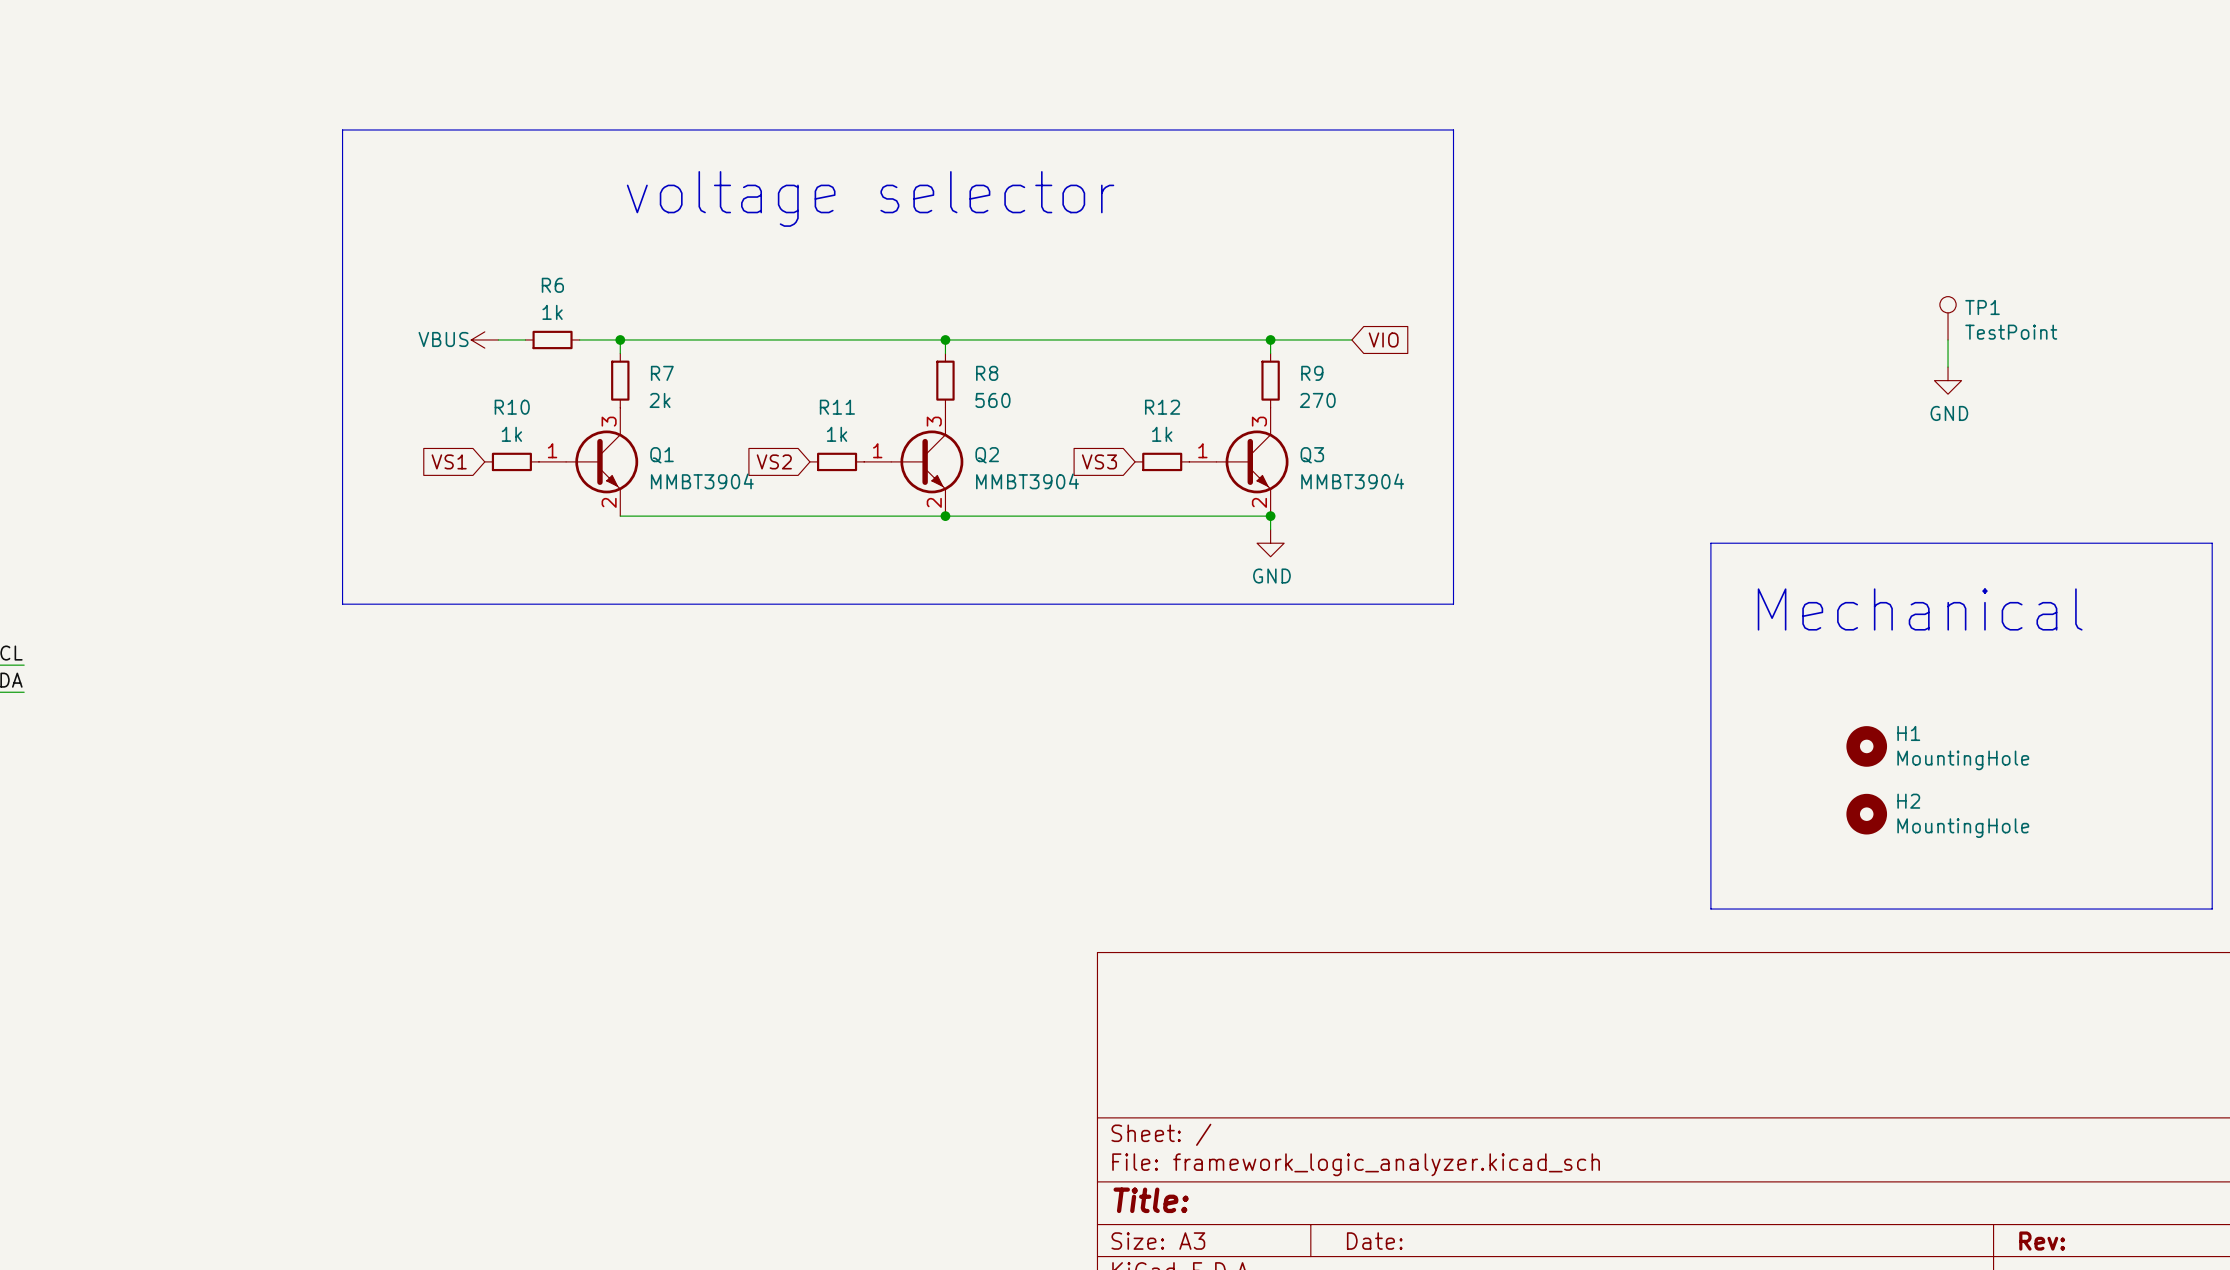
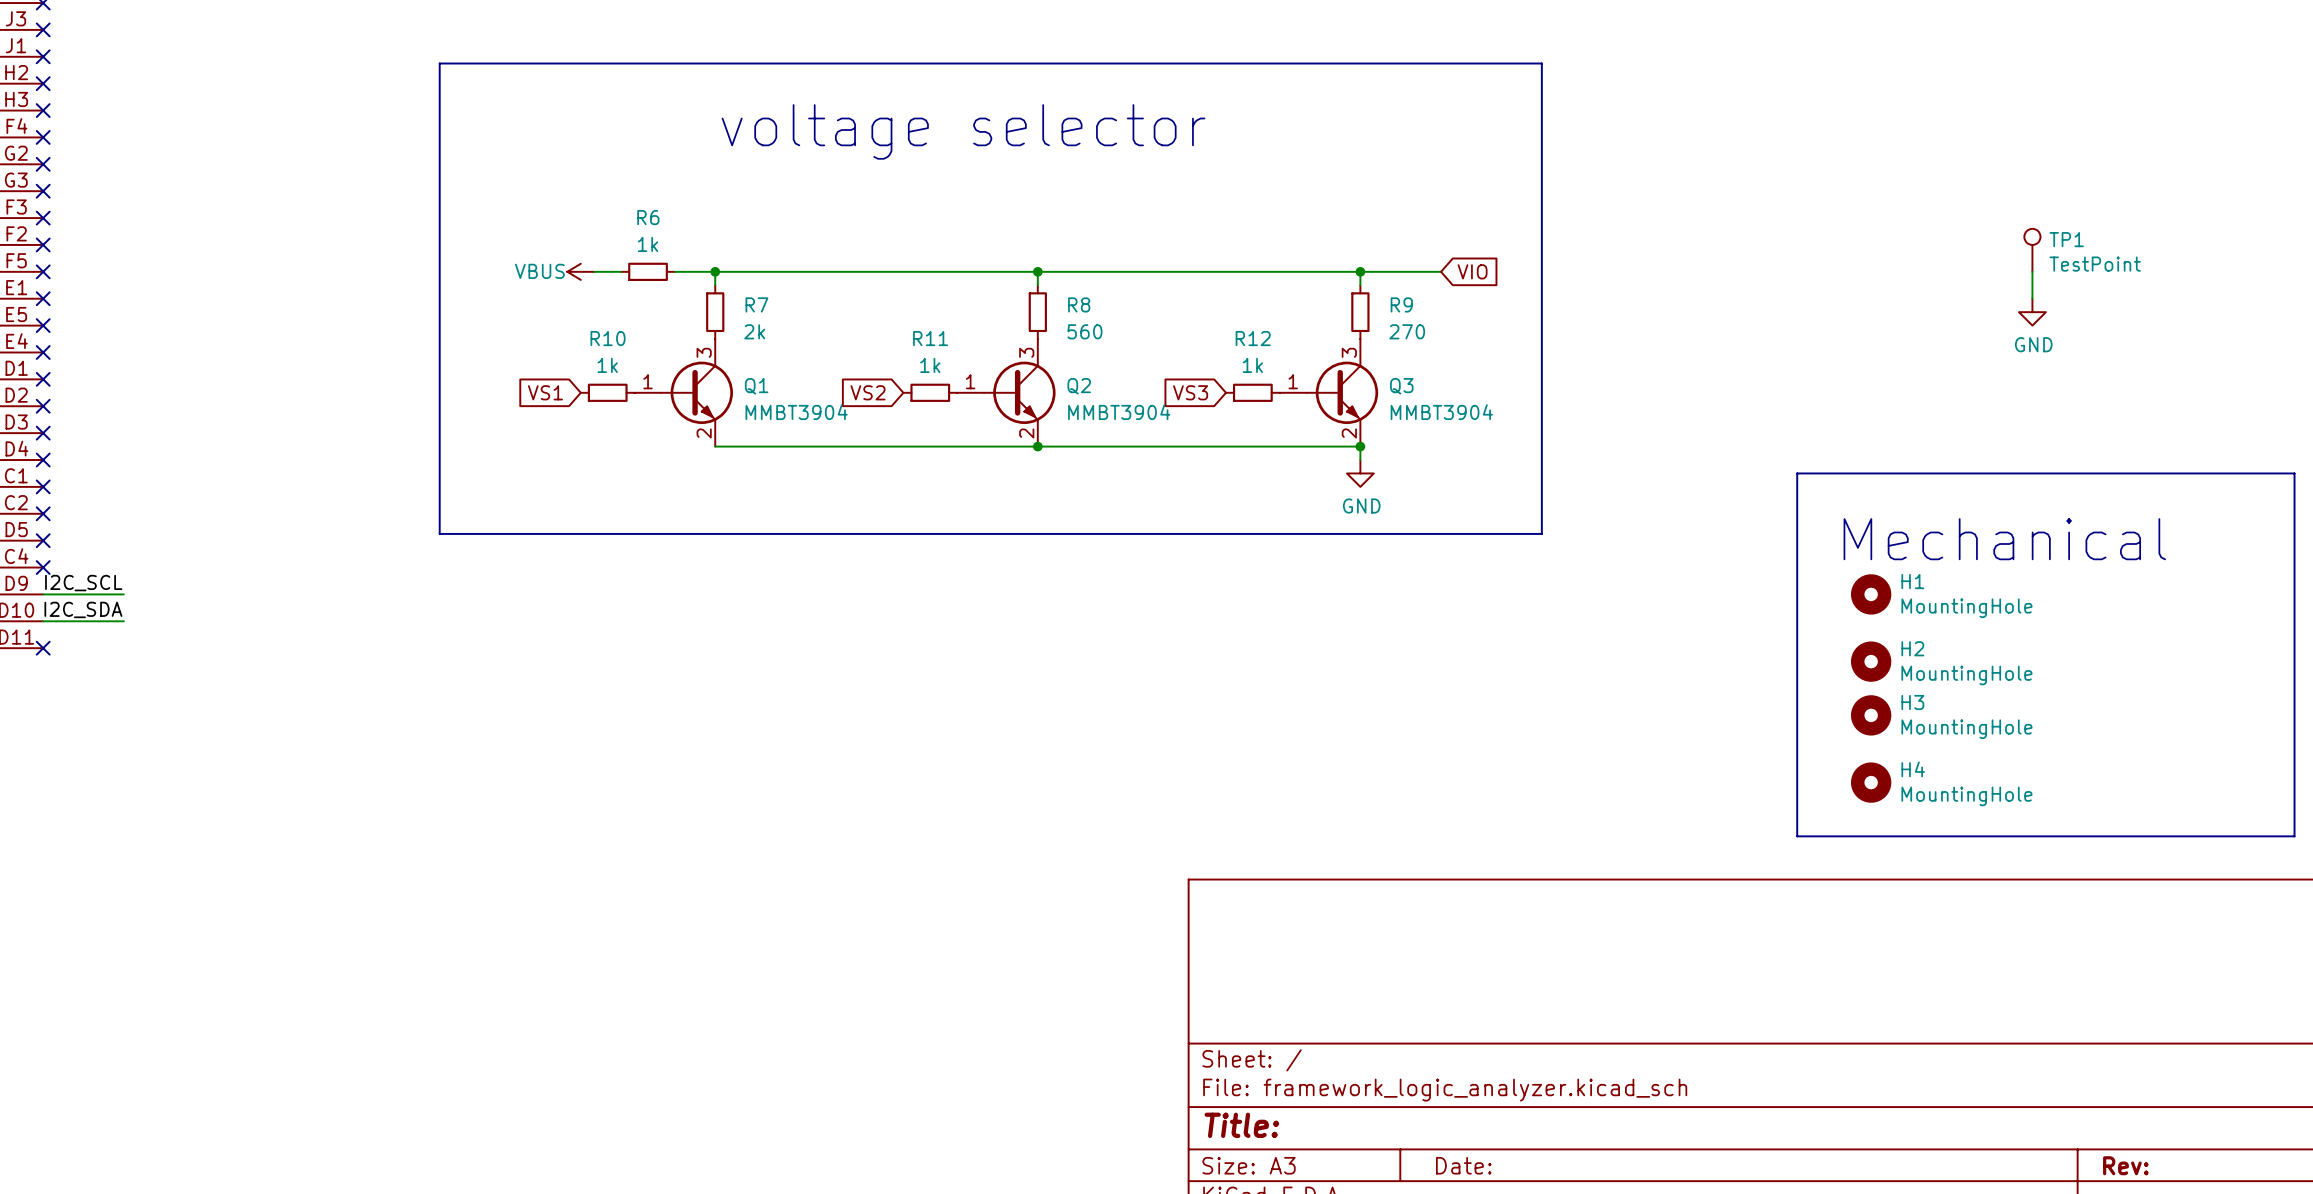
H1 position: (1866, 746) -> (1871, 594)
H3: none -> MountingHole (1871, 715)
H2 position: (1866, 814) -> (1871, 661)
H4: none -> MountingHole (1871, 782)

